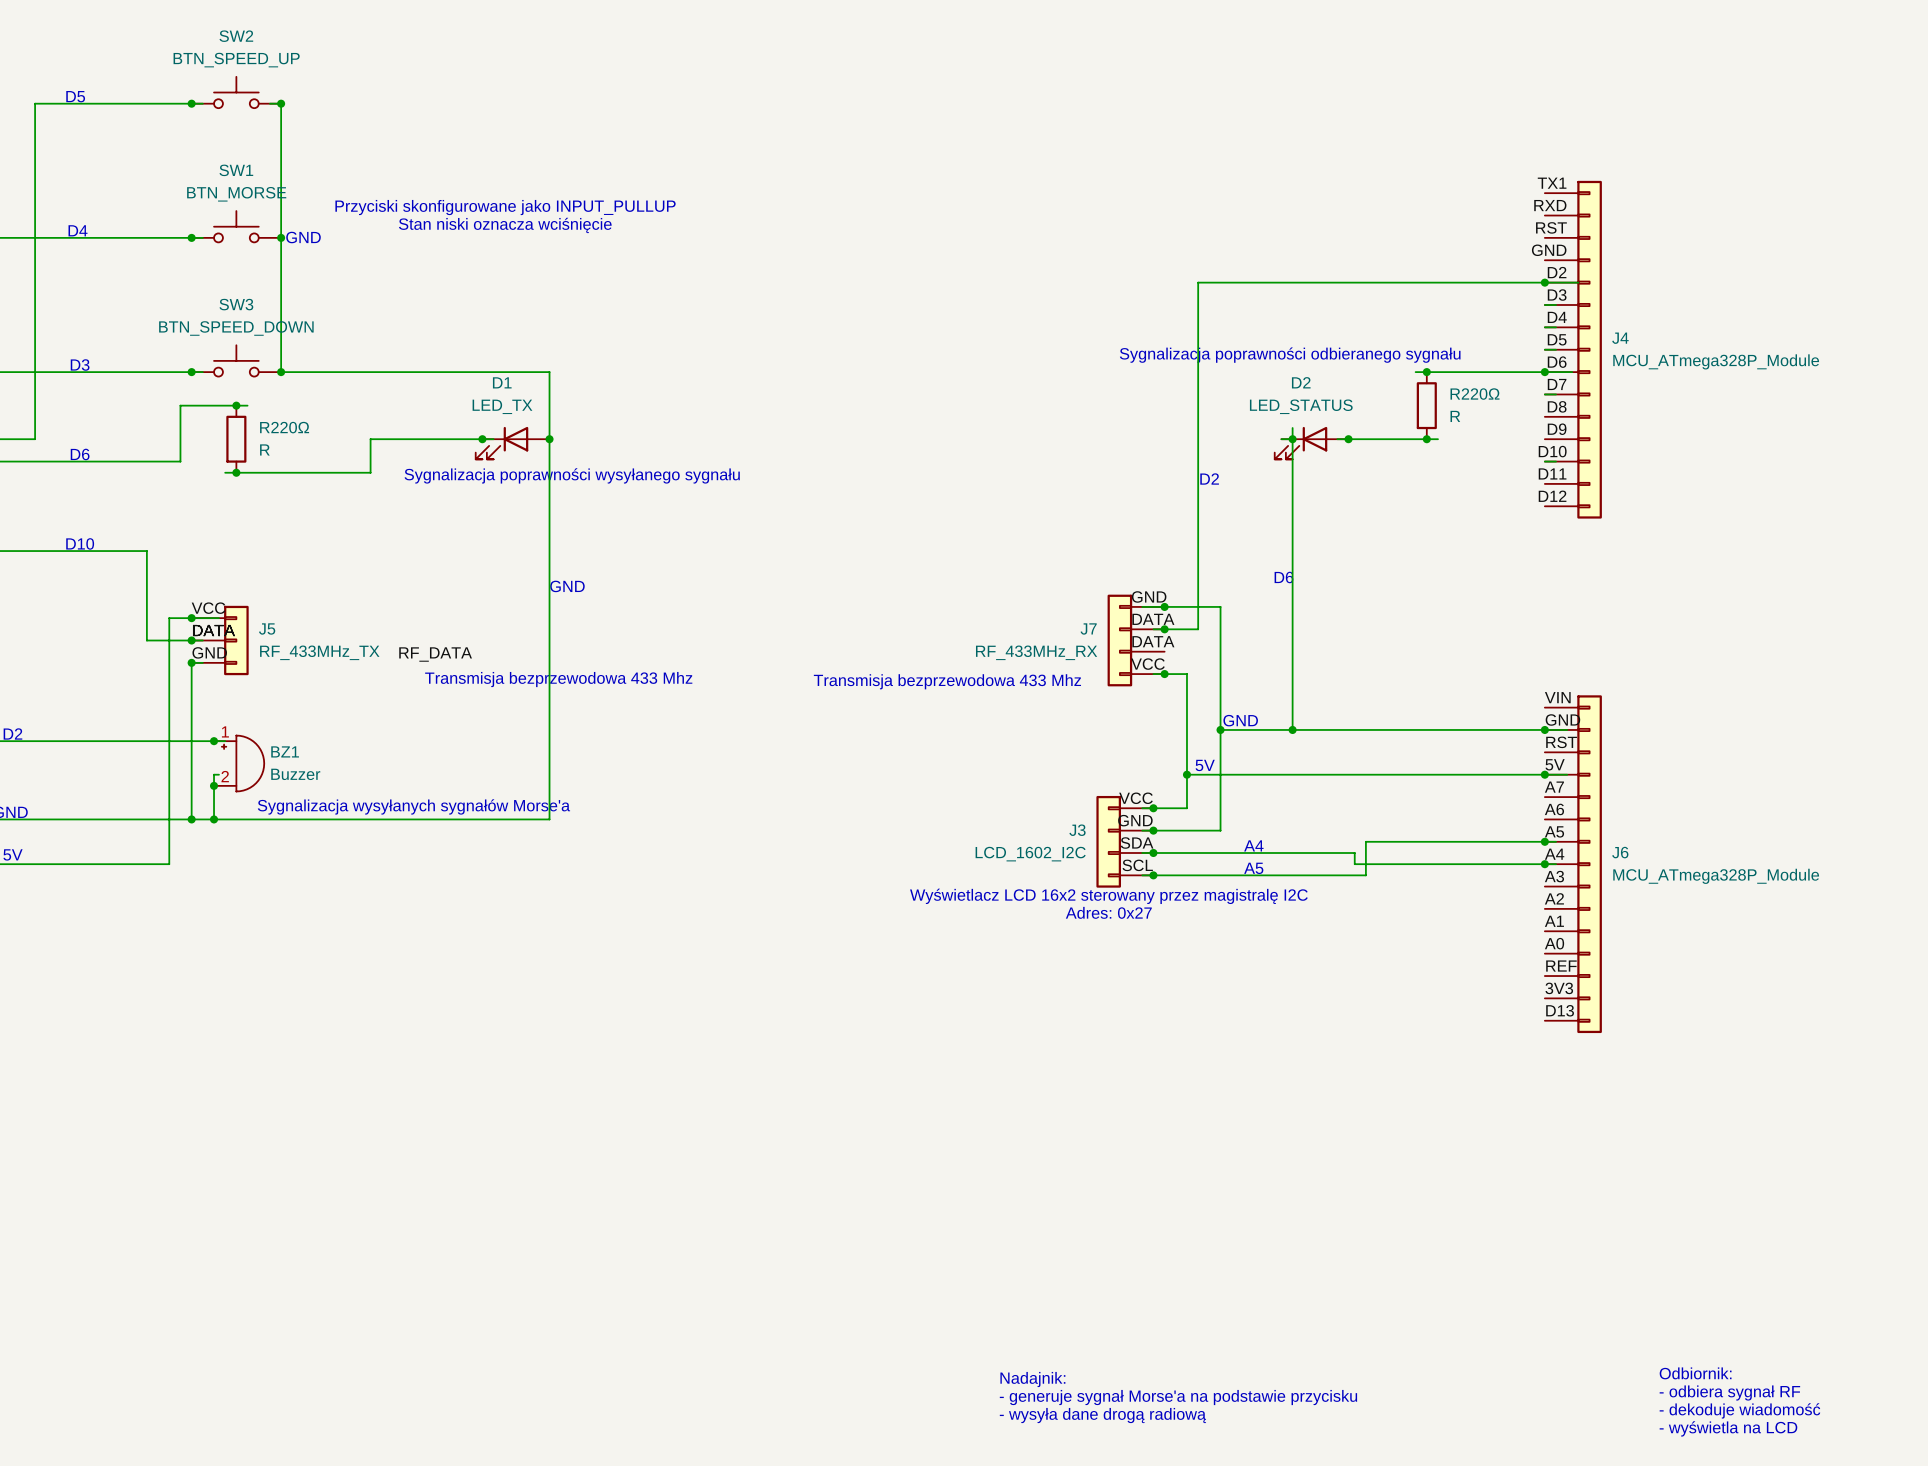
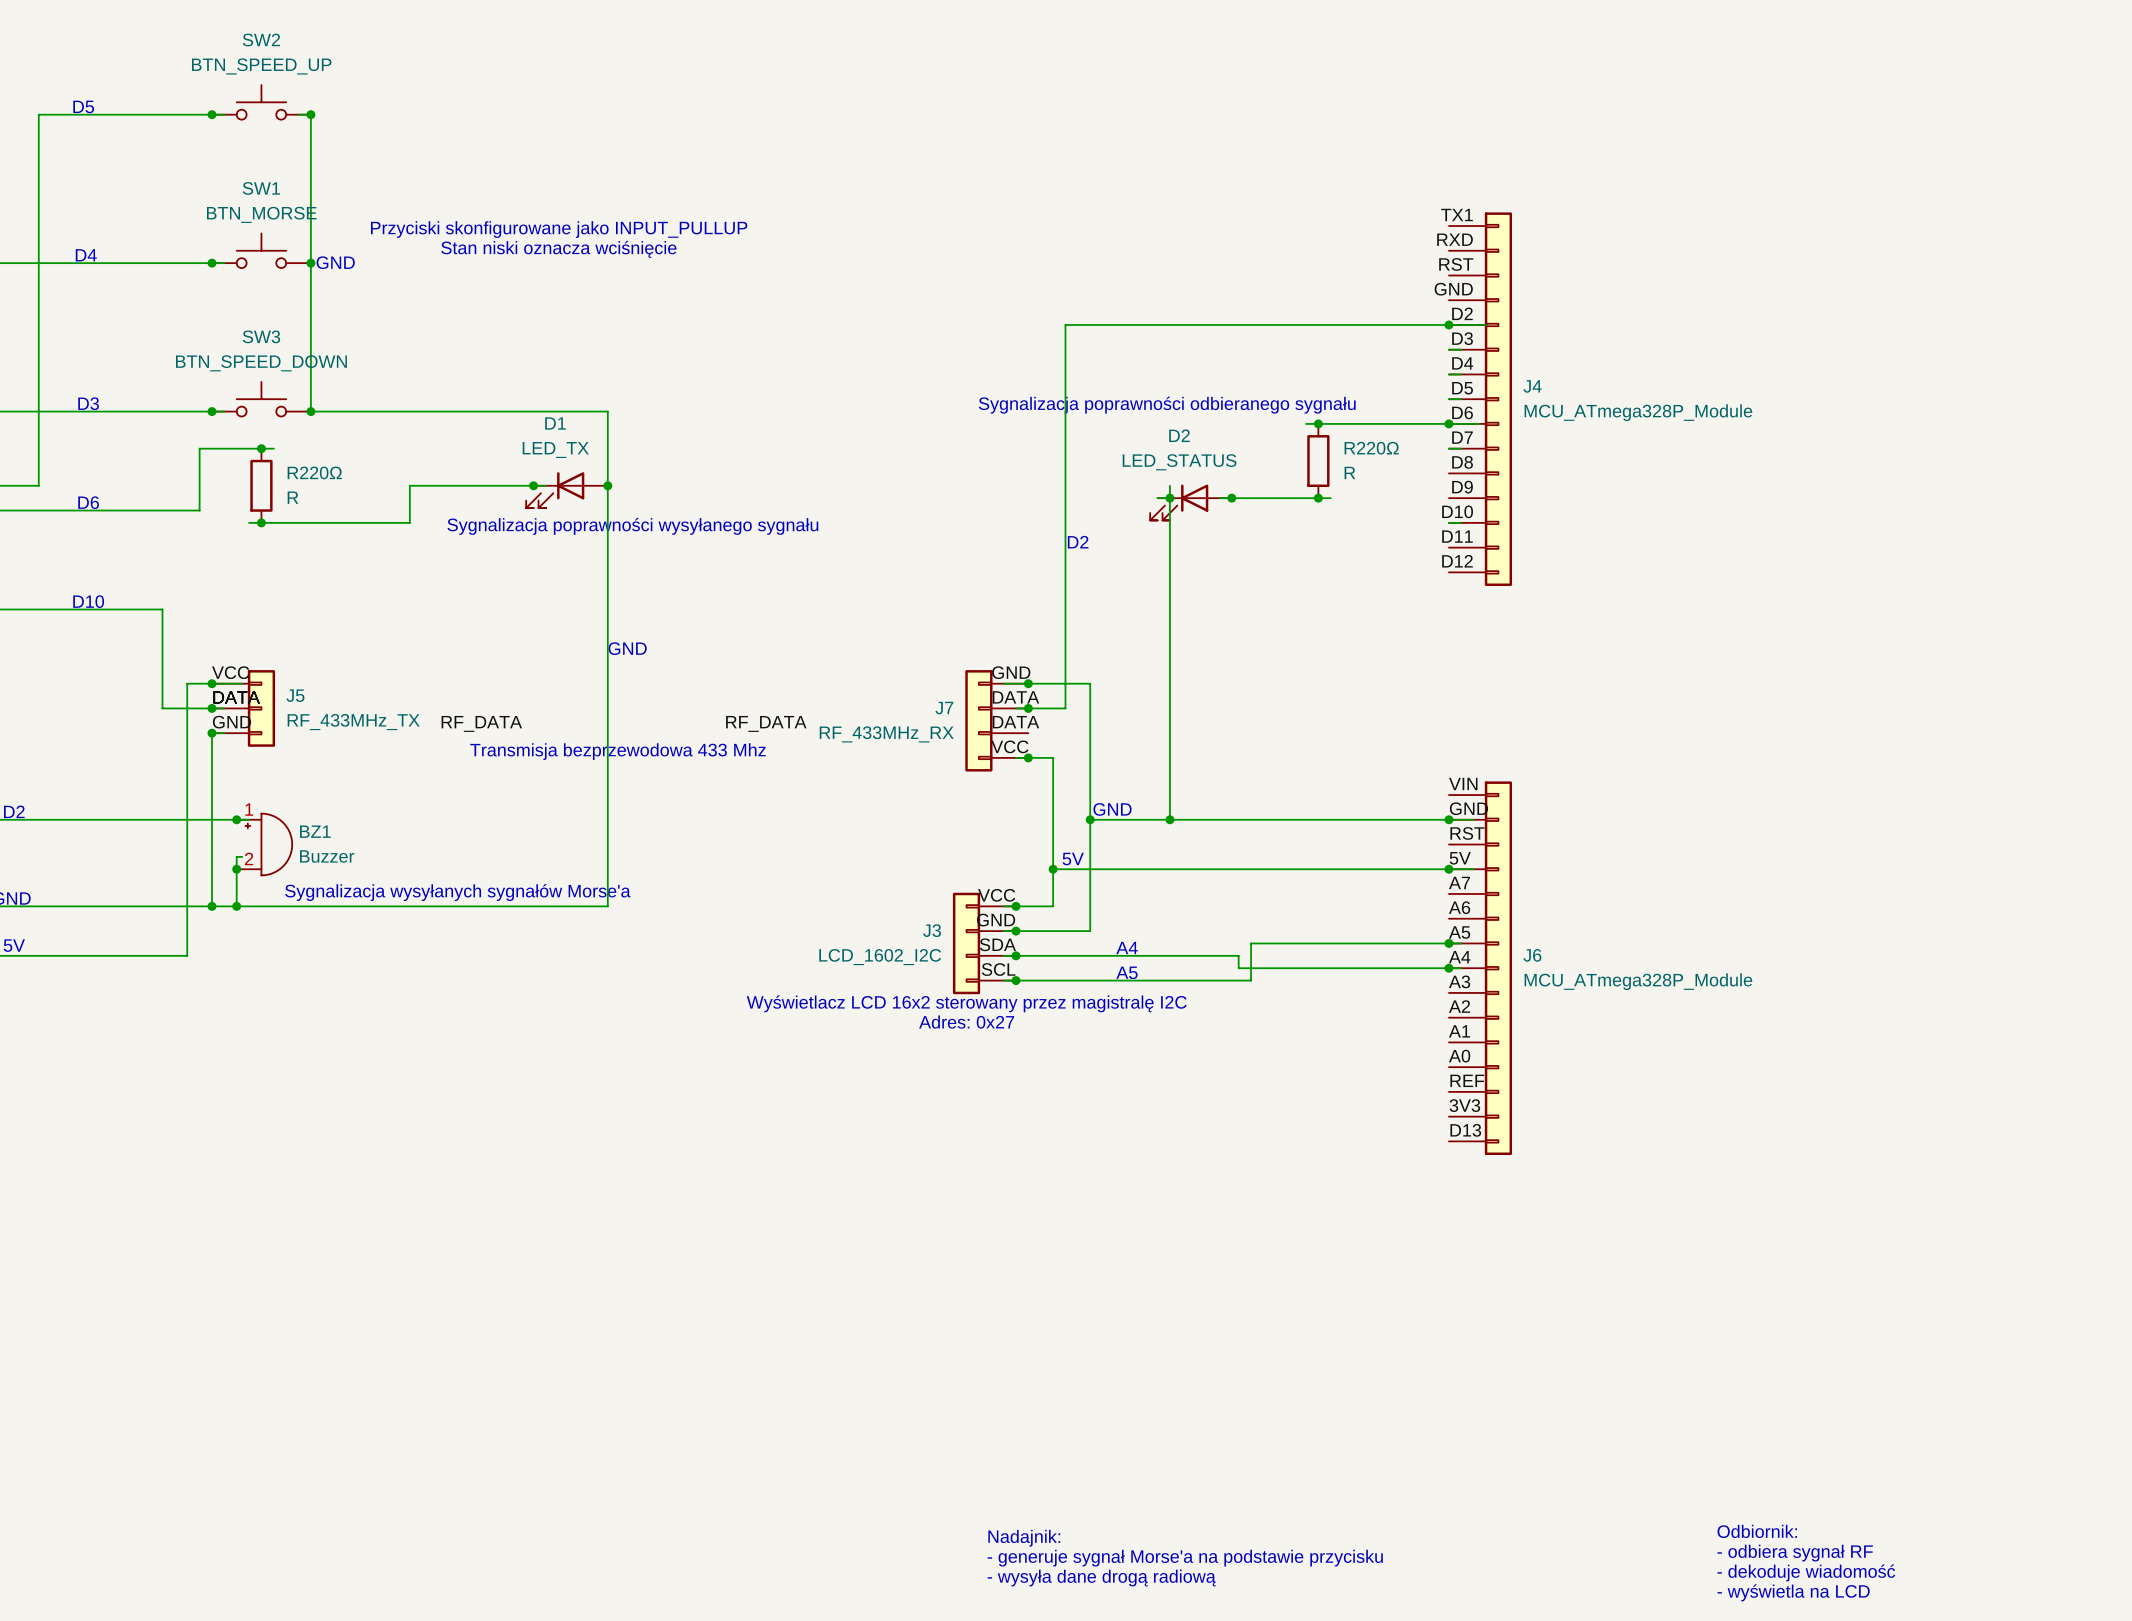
label: TX1 (1552, 183) -> none
label: none -> TX1 (1456, 214)
label: RXD (1550, 205) -> none
label: none -> RXD (1455, 239)
label: RST (1551, 227) -> none
label: none -> RST (1456, 264)
label: GND (1549, 250) -> none
label: none -> GND (1453, 289)
label: D2 (1557, 272) -> none
junction: (1544, 282) -> none
wire: (1578, 282) (1198, 282) (1198, 629) (1153, 629) -> none
label: none -> D2 (1462, 313)
junction: none -> (1448, 324)
wire: none -> (1486, 324) (1065, 324) (1065, 708) (1016, 708)
label: D3 (1557, 295) -> none
wire: (1544, 305) (1556, 305) -> none
label: none -> D3 (1462, 338)
wire: none -> (1448, 349) (1461, 349)
label: D4 (1557, 317) -> none
wire: (1544, 327) (1556, 327) -> none
label: none -> D4 (1462, 363)
wire: none -> (1448, 374) (1461, 374)
label: D5 (1557, 339) -> none
wire: (1544, 349) (1556, 349) -> none
J4 position: (1573, 349) -> (1480, 399)
label: none -> D5 (1462, 388)
text: Sygnalizacja poprawności odbieranego sygnału (1290, 355) -> none
wire: none -> (1448, 399) (1461, 399)
label: D6 (1557, 362) -> none
text: none -> Sygnalizacja poprawności odbieranego sygnału (1167, 405)
wire: (1415, 372) (1572, 372) -> none
junction: (1426, 372) -> none
junction: (1544, 372) -> none
label: none -> D6 (1462, 412)
wire: none -> (1306, 423) (1479, 423)
junction: none -> (1318, 423)
junction: none -> (1448, 423)
label: D7 (1557, 384) -> none
wire: (1544, 394) (1556, 394) -> none
label: none -> D7 (1462, 437)
R220Ω: R (1426, 405) -> none
label: D8 (1557, 406) -> none
R220Ω: none -> R (1318, 461)
label: none -> D8 (1462, 462)
wire: (1292, 428) (1292, 729) -> none
label: D9 (1557, 429) -> none
wire: none -> (1169, 485) (1169, 819)
wire: (1281, 439) (1292, 439) -> (1448, 448) (1461, 448)
junction: (1292, 439) -> none
wire: (1337, 439) (1437, 439) -> none
junction: (1348, 439) -> none
junction: (1426, 439) -> none
label: none -> D9 (1462, 487)
D2 position: (1311, 443) -> (1190, 502)
wire: none -> (1157, 498) (1169, 498)
junction: none -> (1169, 498)
wire: none -> (1219, 498) (1330, 498)
junction: none -> (1231, 498)
junction: none -> (1318, 498)
label: D10 (1552, 451) -> none
wire: (1544, 461) (1556, 461) -> none
label: none -> D10 (1457, 511)
wire: none -> (1448, 522) (1461, 522)
label: D11 (1552, 473) -> none
text: D2 (1209, 478) -> none
label: none -> D11 (1457, 536)
text: none -> D2 (1078, 542)
label: D12 (1552, 496) -> none
label: none -> D12 (1457, 561)
text: D6 (1283, 577) -> none
label: GND (1149, 596) -> none
wire: (1142, 606) (1220, 606) (1220, 830) (1142, 830) -> none
junction: (1164, 606) -> none
label: none -> GND (1011, 672)
wire: none -> (1003, 683) (1090, 683) (1090, 931) (1003, 931)
junction: none -> (1028, 683)
label: DATA (1153, 619) -> none
junction: (1164, 629) -> none
label: none -> DATA (1015, 697)
junction: none -> (1028, 708)
J7 position: (1136, 640) -> (996, 720)
label: DATA (1153, 641) -> none
label: none -> DATA (1015, 722)
label: none -> RF_DATA (766, 723)
label: VCC (1147, 664) -> none
wire: (1153, 674) (1186, 674) (1186, 808) (1142, 808) -> none
junction: (1164, 674) -> none
label: none -> VCC (1009, 746)
text: Transmisja bezprzewodowa 433 Mhz (947, 681) -> none
wire: none -> (1016, 757) (1053, 757) (1053, 906) (1003, 906)
junction: none -> (1028, 757)
label: VIN (1557, 697) -> none
label: none -> VIN (1463, 783)
label: GND (1562, 719) -> none
text: GND (1240, 720) -> none
wire: (1220, 729) (1567, 729) -> none
junction: (1220, 729) -> none
junction position: (1292, 729) -> (1448, 819)
junction: (1544, 729) -> none
text: none -> GND (1112, 809)
label: none -> GND (1468, 808)
wire: none -> (1090, 819) (1473, 819)
junction: none -> (1090, 819)
junction: none -> (1169, 819)
label: RST (1561, 742) -> none
label: none -> RST (1467, 833)
label: 5V (1555, 764) -> none
text: 5V (1205, 765) -> none
wire: (1186, 774) (1567, 774) -> none
junction: (1186, 774) -> none
junction: (1544, 774) -> none
label: none -> 5V (1460, 858)
text: none -> 5V (1073, 859)
wire: none -> (1053, 869) (1473, 869)
junction: none -> (1053, 869)
junction: none -> (1448, 869)
label: A7 (1554, 787) -> none
label: VCC (1136, 798) -> none
label: none -> A7 (1459, 882)
junction: (1153, 808) -> none
label: none -> VCC (996, 895)
label: A6 (1554, 809) -> none
junction: none -> (1016, 906)
label: GND (1135, 820) -> none
label: none -> A6 (1459, 907)
junction: (1153, 830) -> none
label: none -> GND (996, 920)
label: A5 (1554, 831) -> none
junction: none -> (1016, 931)
J3 position: (1124, 841) -> (984, 943)
junction: (1544, 841) -> none
wire: (1556, 841) (1365, 841) (1365, 875) (1321, 875) -> none
label: SDA (1137, 843) -> none
label: none -> A5 (1459, 932)
text: A4 (1253, 845) -> none
wire: none -> (1263, 943) (1251, 943) (1251, 980) (1003, 980)
junction: (1153, 852) -> none
junction: none -> (1448, 943)
wire: (1321, 852) (1354, 852) (1354, 864) (1556, 864) -> none
label: none -> SDA (997, 944)
label: A4 (1554, 854) -> none
text: none -> A4 (1127, 947)
wire: none -> (1003, 955) (1238, 955) (1238, 968) (1263, 968)
junction: none -> (1016, 955)
junction: (1544, 864) -> none
J6 position: (1573, 864) -> (1480, 968)
label: SCL (1137, 865) -> none
label: none -> A4 (1459, 957)
text: A5 (1253, 868) -> none
junction: (1153, 875) -> none
junction: none -> (1448, 968)
label: none -> SCL (998, 969)
label: A3 (1554, 876) -> none
text: none -> A5 (1126, 972)
junction: none -> (1016, 980)
label: none -> A3 (1459, 981)
text: Wyświetlacz LCD 16x2 sterowany przez magistralę I2C (1108, 896) -> none
label: A2 (1554, 898) -> none
text: none -> Wyświetlacz LCD 16x2 sterowany przez magistralę I2C (966, 1003)
label: none -> A2 (1459, 1006)
text: Adres: 0x27 (1108, 912) -> none
label: A1 (1554, 921) -> none
text: none -> Adres: 0x27 (966, 1022)
label: none -> A1 (1459, 1031)
label: A0 (1554, 943) -> none
label: none -> A0 (1459, 1056)
label: REF (1561, 966) -> none
label: none -> REF (1467, 1080)
label: 3V3 (1559, 988) -> none
label: none -> 3V3 (1464, 1105)
label: D13 (1560, 1010) -> none
label: none -> D13 (1465, 1130)
text position: Odbiornik: (1695, 1373) -> Odbiornik: (1757, 1531)
text position: Nadajnik: (1032, 1379) -> Nadajnik: (1024, 1538)
text position: - odbiera sygnał RF (1729, 1392) -> - odbiera sygnał RF (1795, 1553)
text position: - generuje sygnał Morse'a na podstawie przycisku (1178, 1397) -> - generuje sygnał Morse'a na podstawie przycisku (1185, 1558)
text position: - dekoduje wiadomość (1739, 1410) -> - dekoduje wiadomość (1806, 1572)
text position: - wysyła dane drogą radiową (1102, 1415) -> - wysyła dane drogą radiową (1101, 1578)
text position: - wyświetla na LCD (1728, 1428) -> - wyświetla na LCD (1793, 1592)

